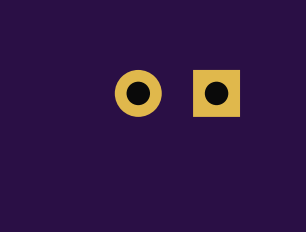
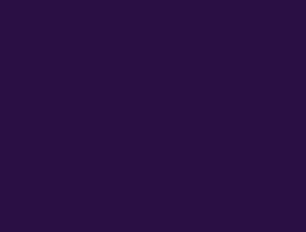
part: (177, 93) -> none

